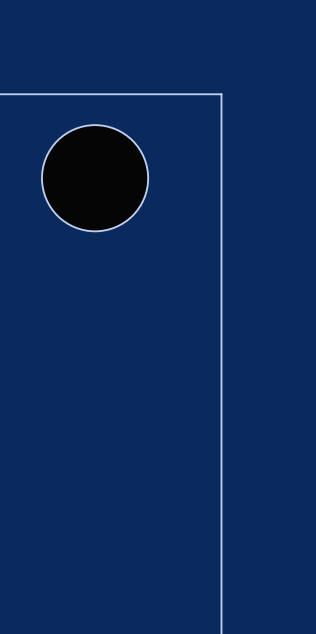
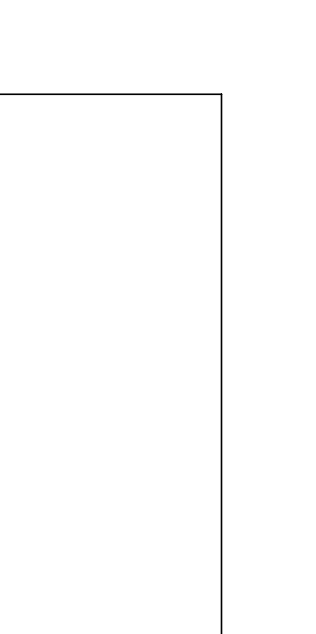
hole: (95, 178) -> none

